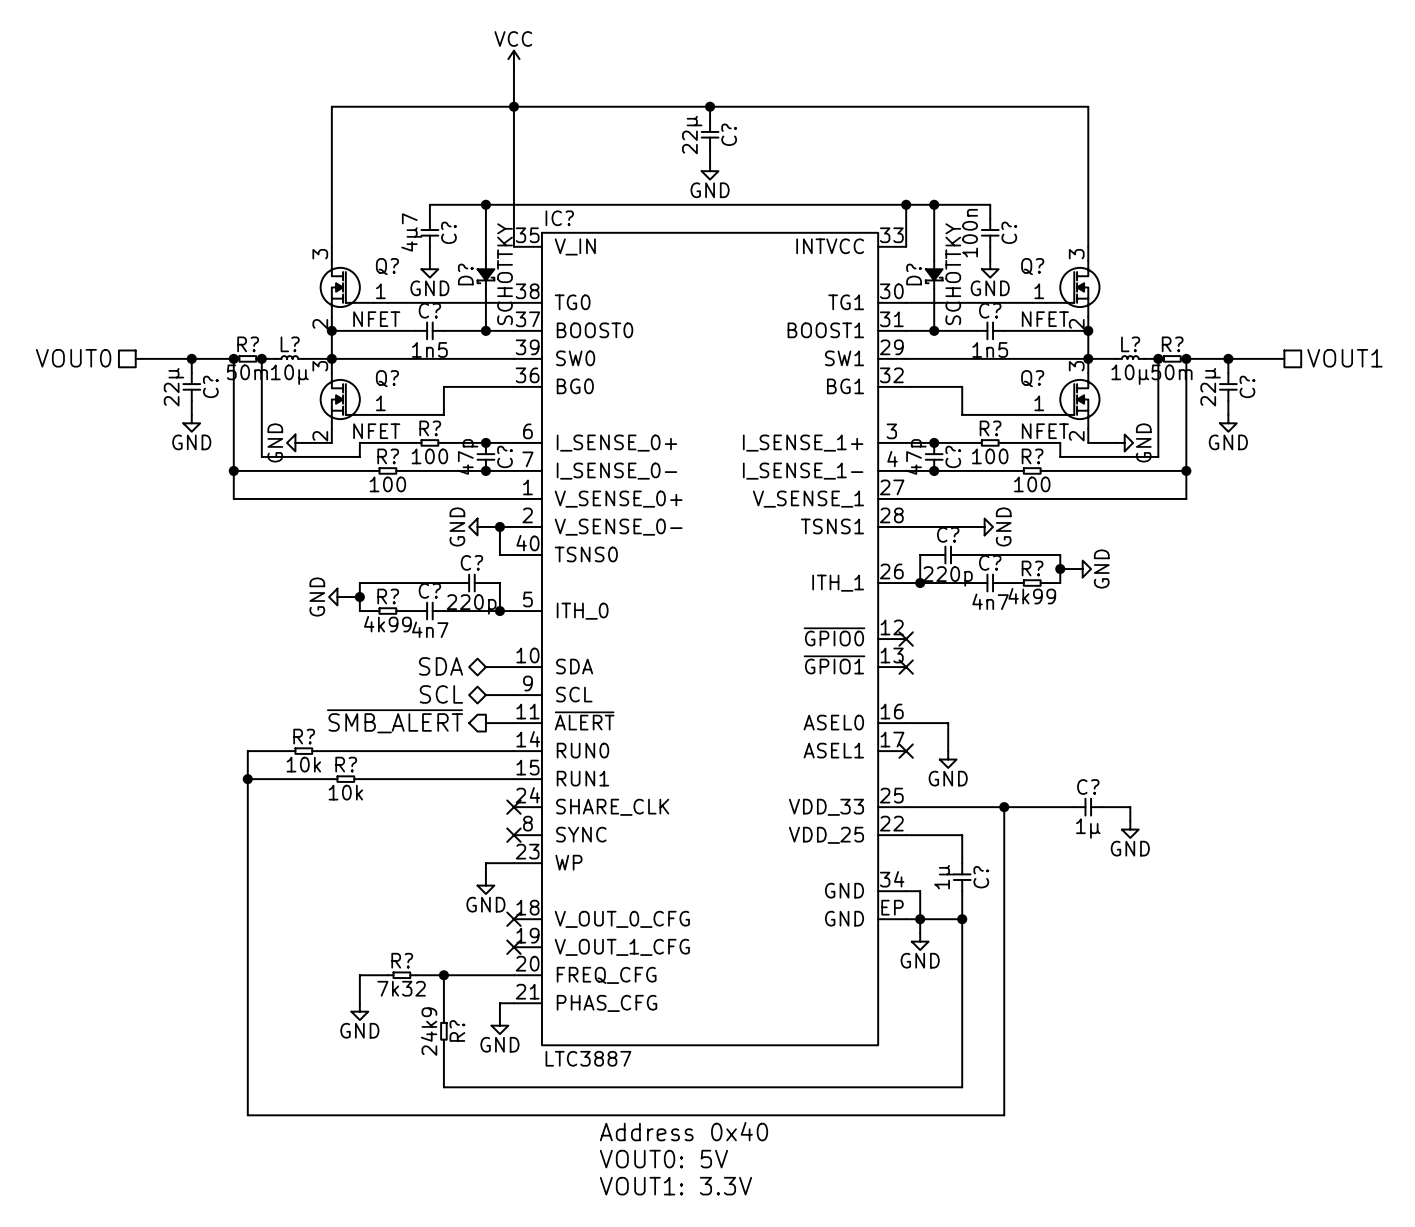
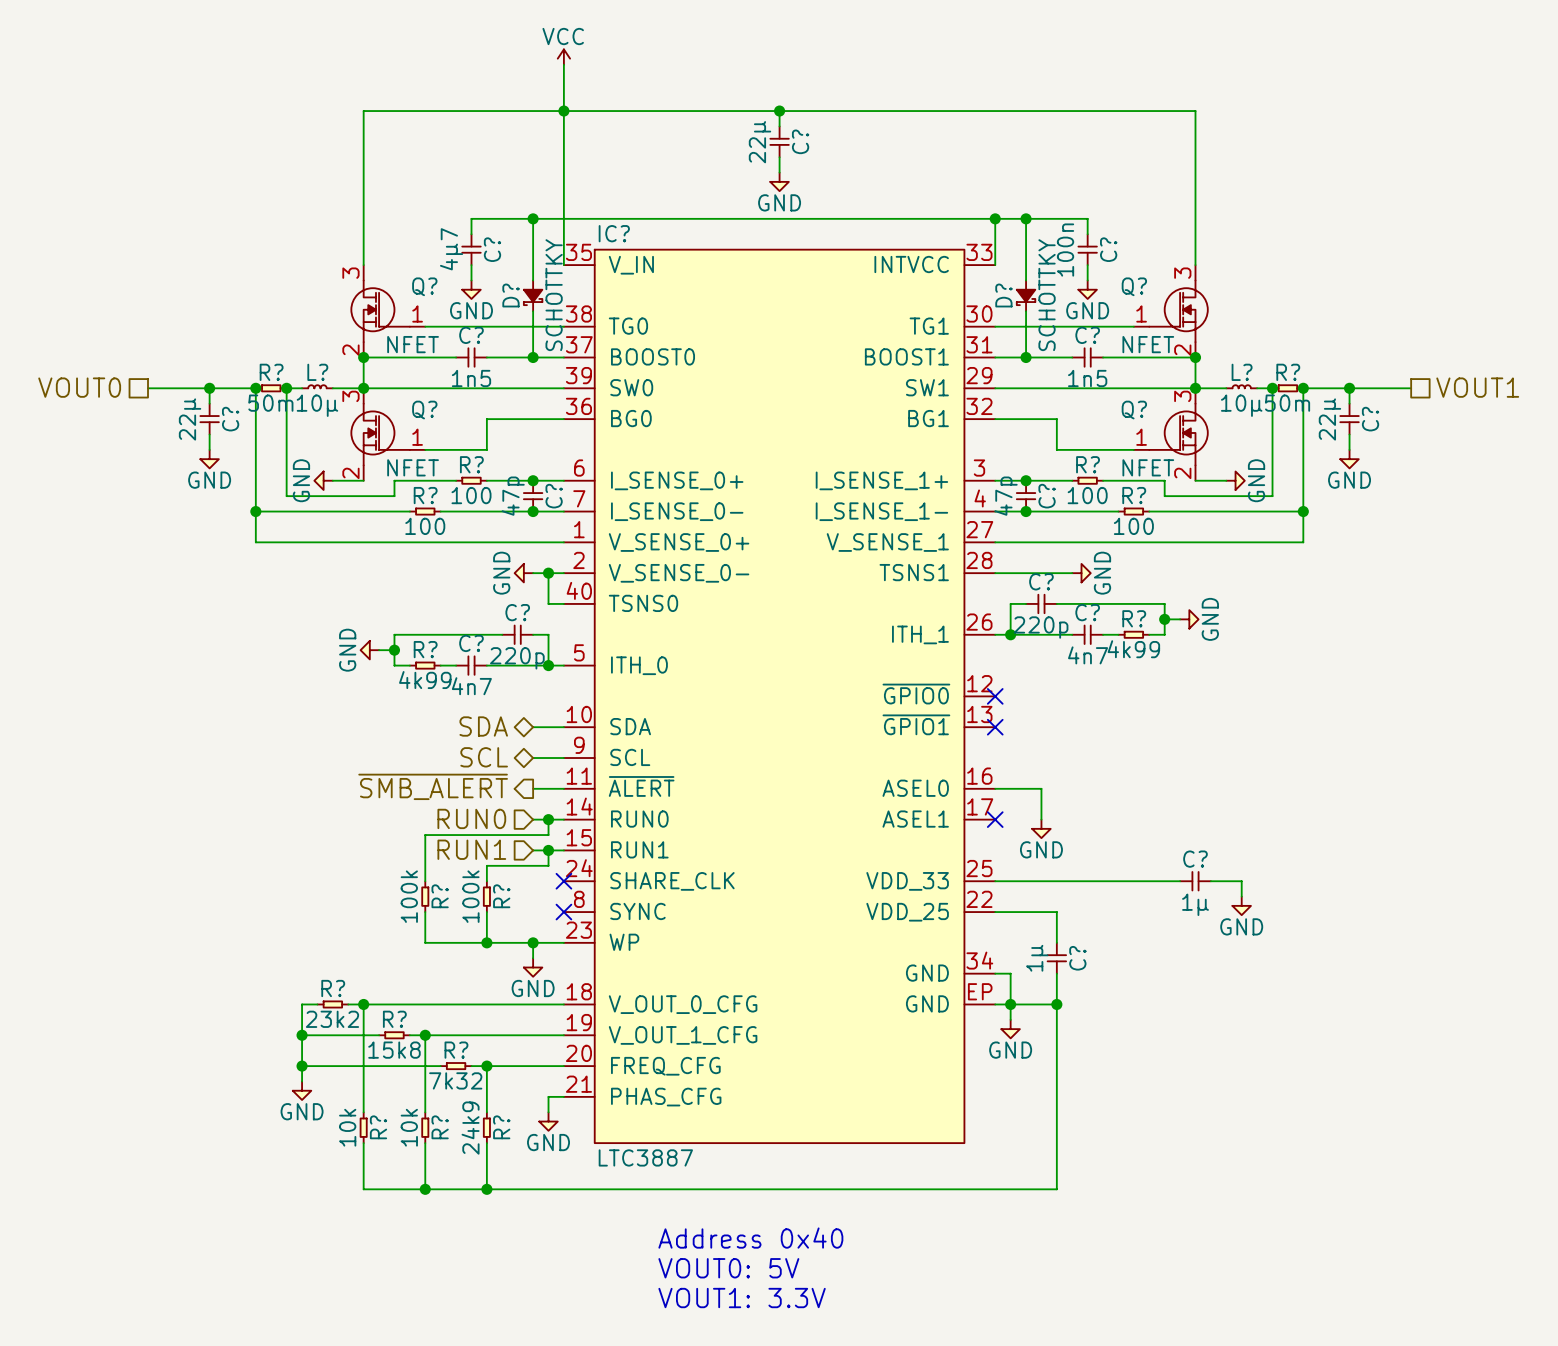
hierarchical label: none -> RUN0 (471, 818)
wire: (289, 751) (247, 751) (247, 1115) (1004, 1115) (1004, 807) -> none
R?: 10k (303, 751) -> none
wire: (317, 751) (485, 751) -> none
wire: none -> (548, 819) (548, 835) (425, 835) (425, 881)
junction: none -> (548, 819)
hierarchical label: none -> RUN1 (471, 849)
wire: (247, 779) (331, 779) -> none
junction: (247, 779) -> none
R?: 10k (345, 779) -> none
wire: (359, 779) (485, 779) -> none
wire: none -> (548, 850) (548, 865) (486, 865) (486, 881)
junction: none -> (548, 850)
junction: (1004, 807) -> none
R?: none -> 100k (425, 896)
R?: none -> 100k (486, 896)
wire: none -> (425, 912) (425, 942) (533, 942)
wire: none -> (486, 912) (486, 942)
junction: none -> (486, 942)
junction: none -> (533, 942)
wire: none -> (317, 1004) (302, 1004) (302, 1081)
R?: none -> 23k2 (332, 1004)
wire: none -> (348, 1004) (563, 1004)
wire: none -> (363, 1004) (363, 1112)
junction: none -> (363, 1004)
no-connect mark: (513, 919) -> none
wire: none -> (302, 1035) (379, 1035)
junction: none -> (302, 1035)
R?: none -> 15k8 (394, 1035)
wire: none -> (409, 1035) (563, 1035)
wire: none -> (425, 1035) (425, 1112)
junction: none -> (425, 1035)
no-connect mark: (513, 947) -> none
junction: none -> (302, 1066)
wire: (359, 975) (359, 1003) -> (394, 1066) (302, 1066)
R? position: (401, 975) -> (456, 1066)
power symbol position: GND (359, 1011) -> GND (302, 1090)
R?: none -> 10k (363, 1127)
R?: none -> 10k (425, 1127)
wire: none -> (363, 1143) (363, 1189) (486, 1189)
wire: none -> (425, 1143) (425, 1189)
junction: none -> (425, 1189)
junction: none -> (486, 1189)

